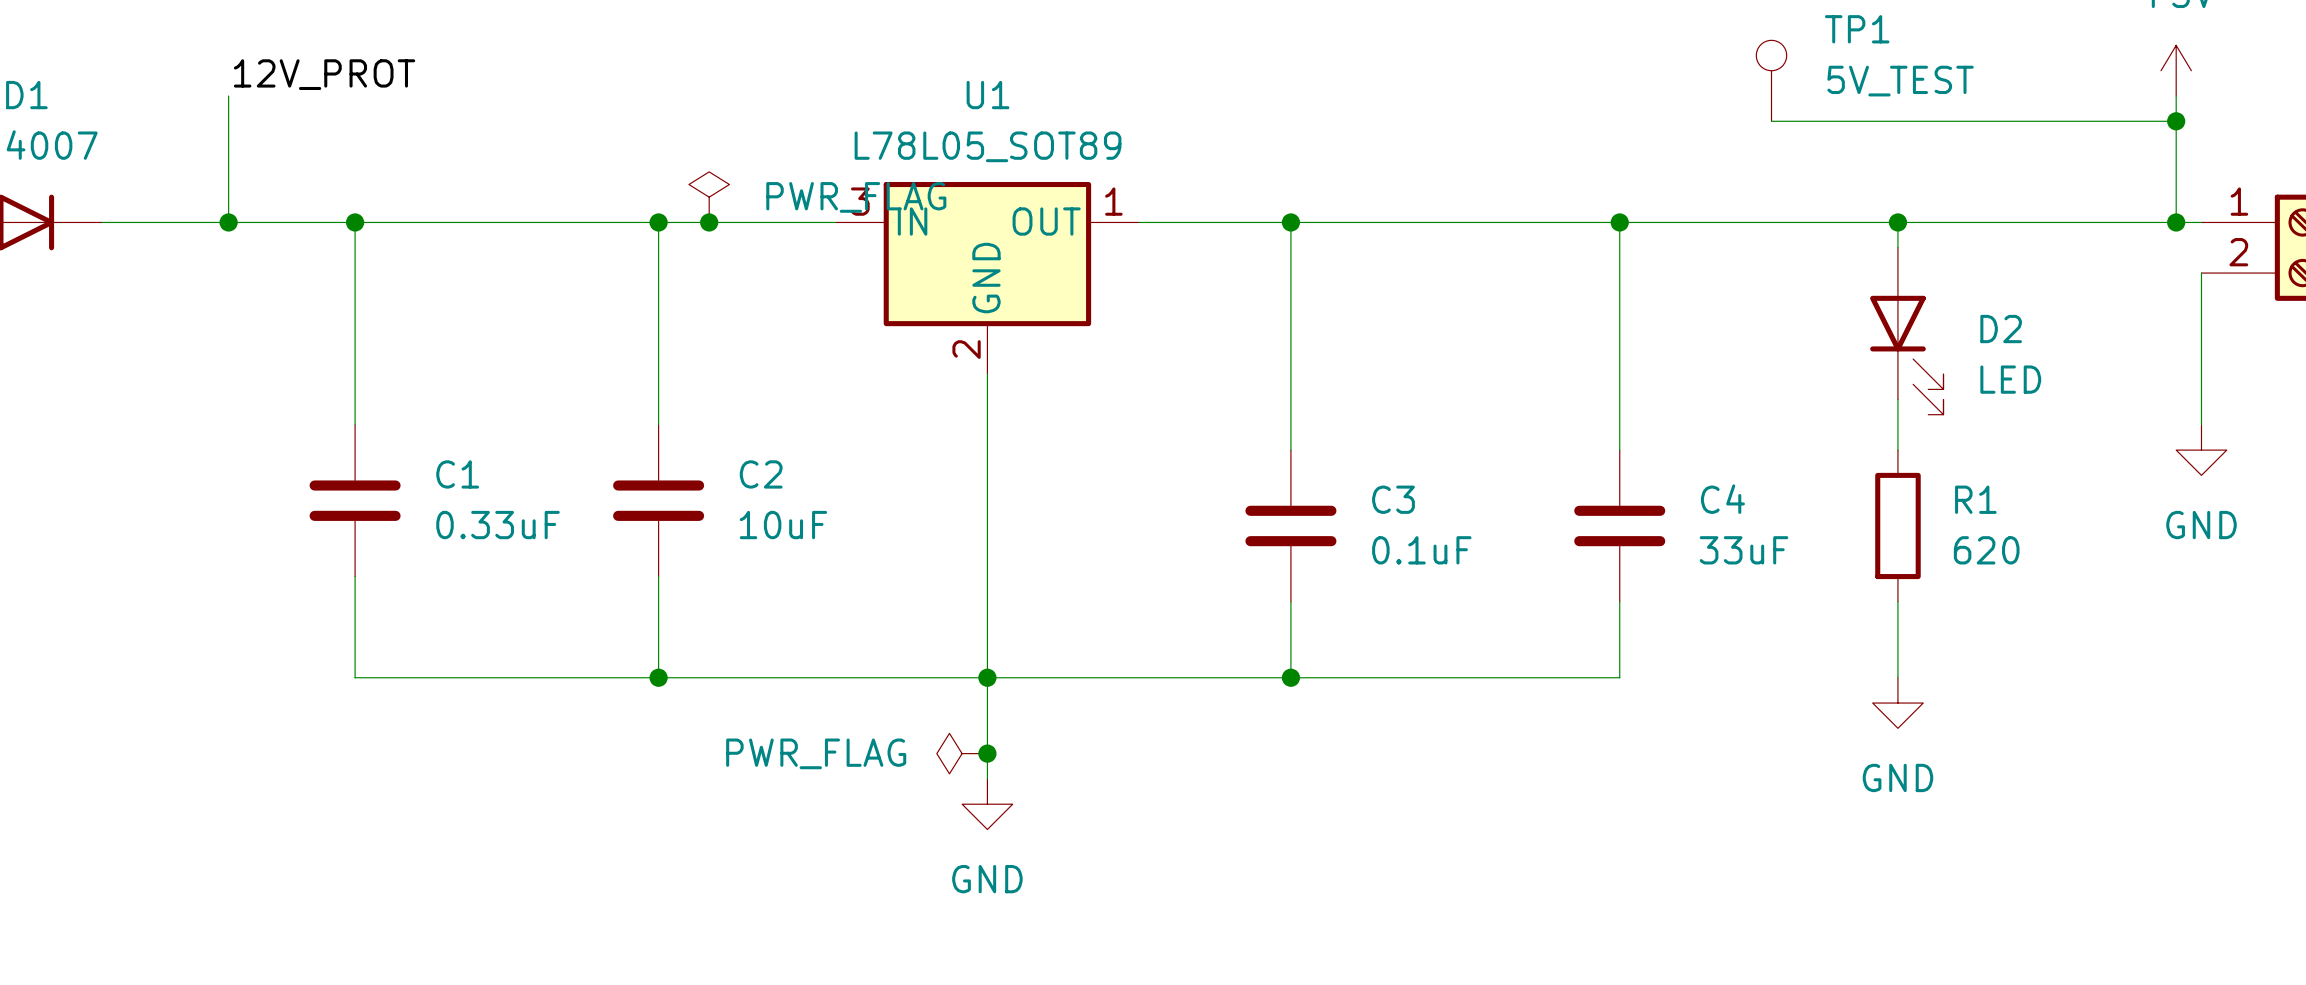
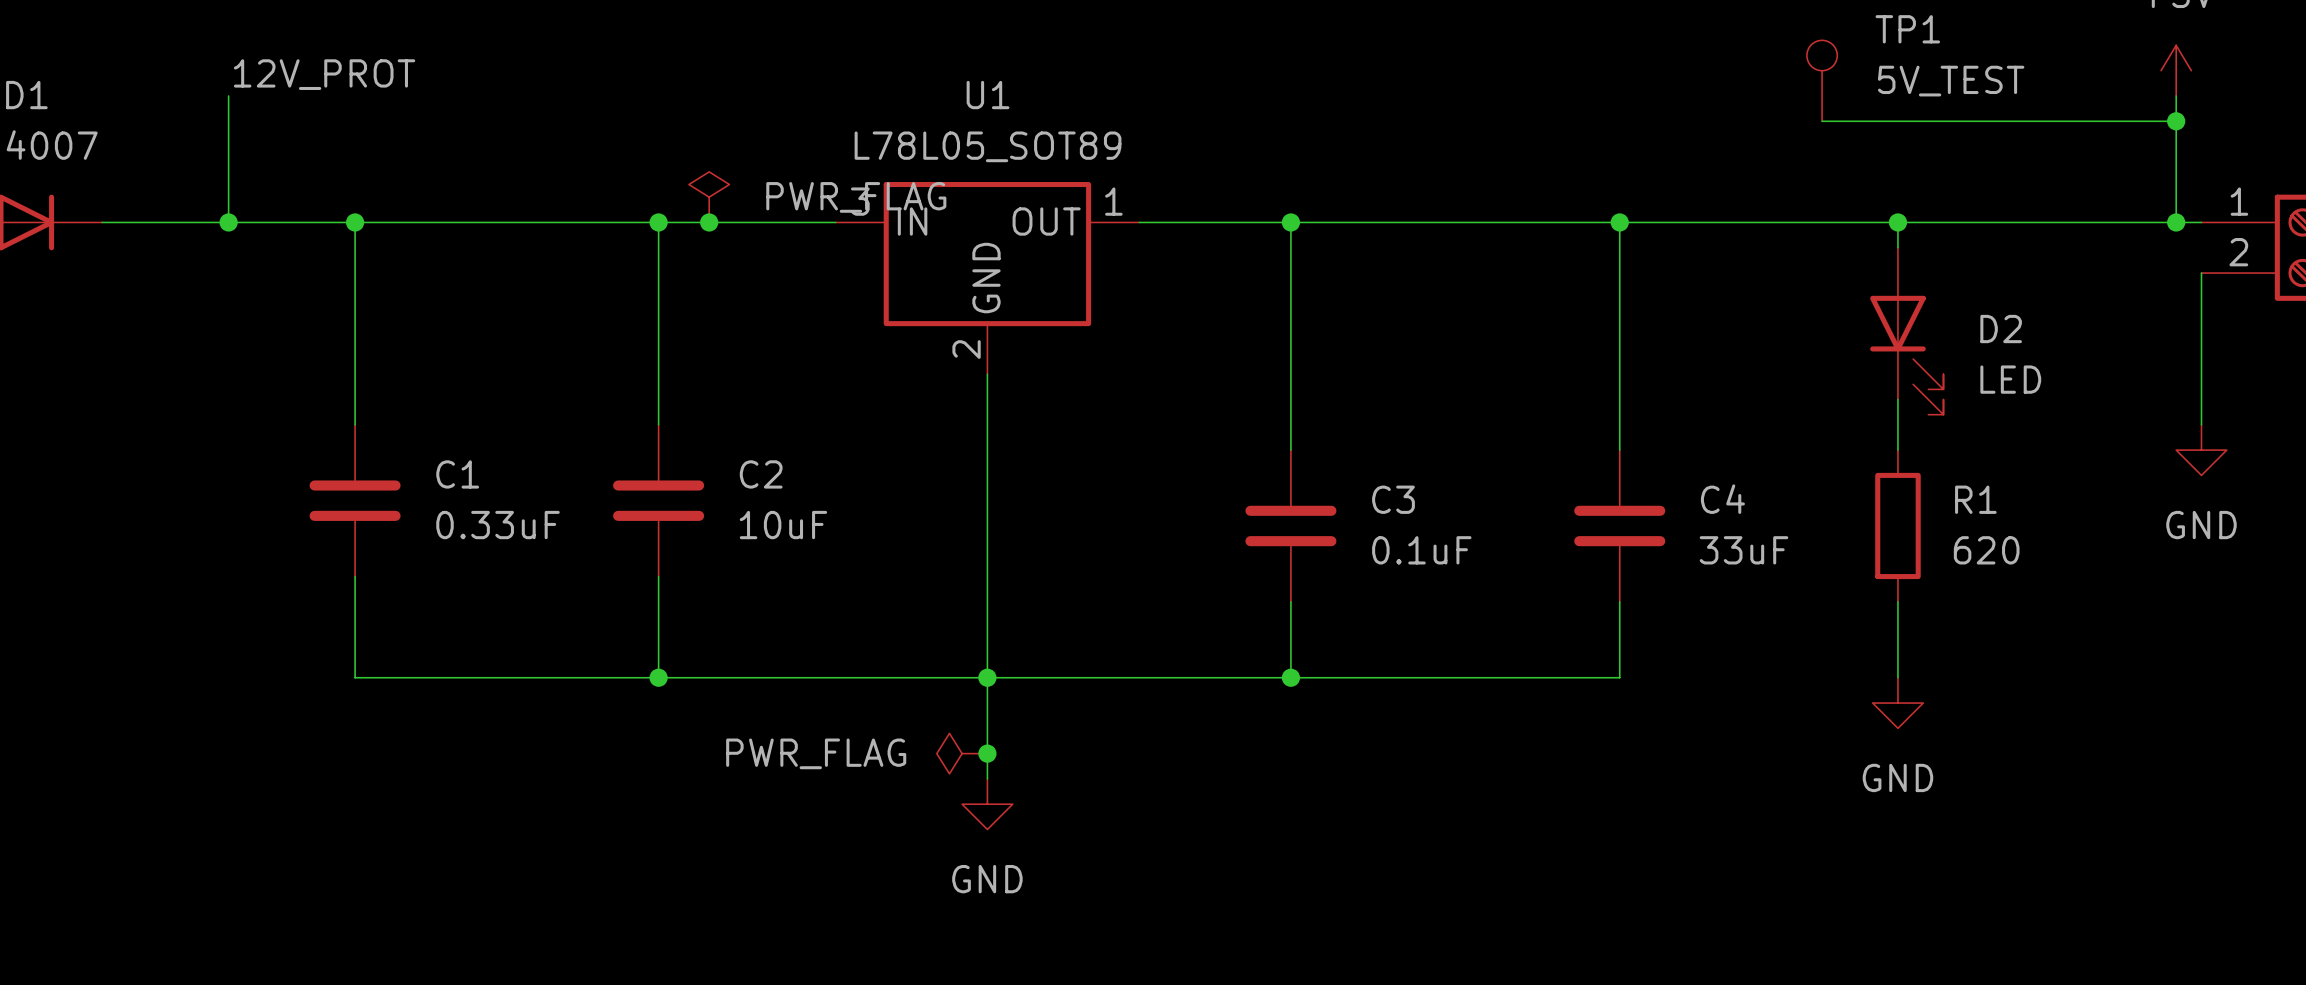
TP1 position: (1771, 80) -> (1822, 80)
wire: (1771, 121) (1822, 121) -> none

